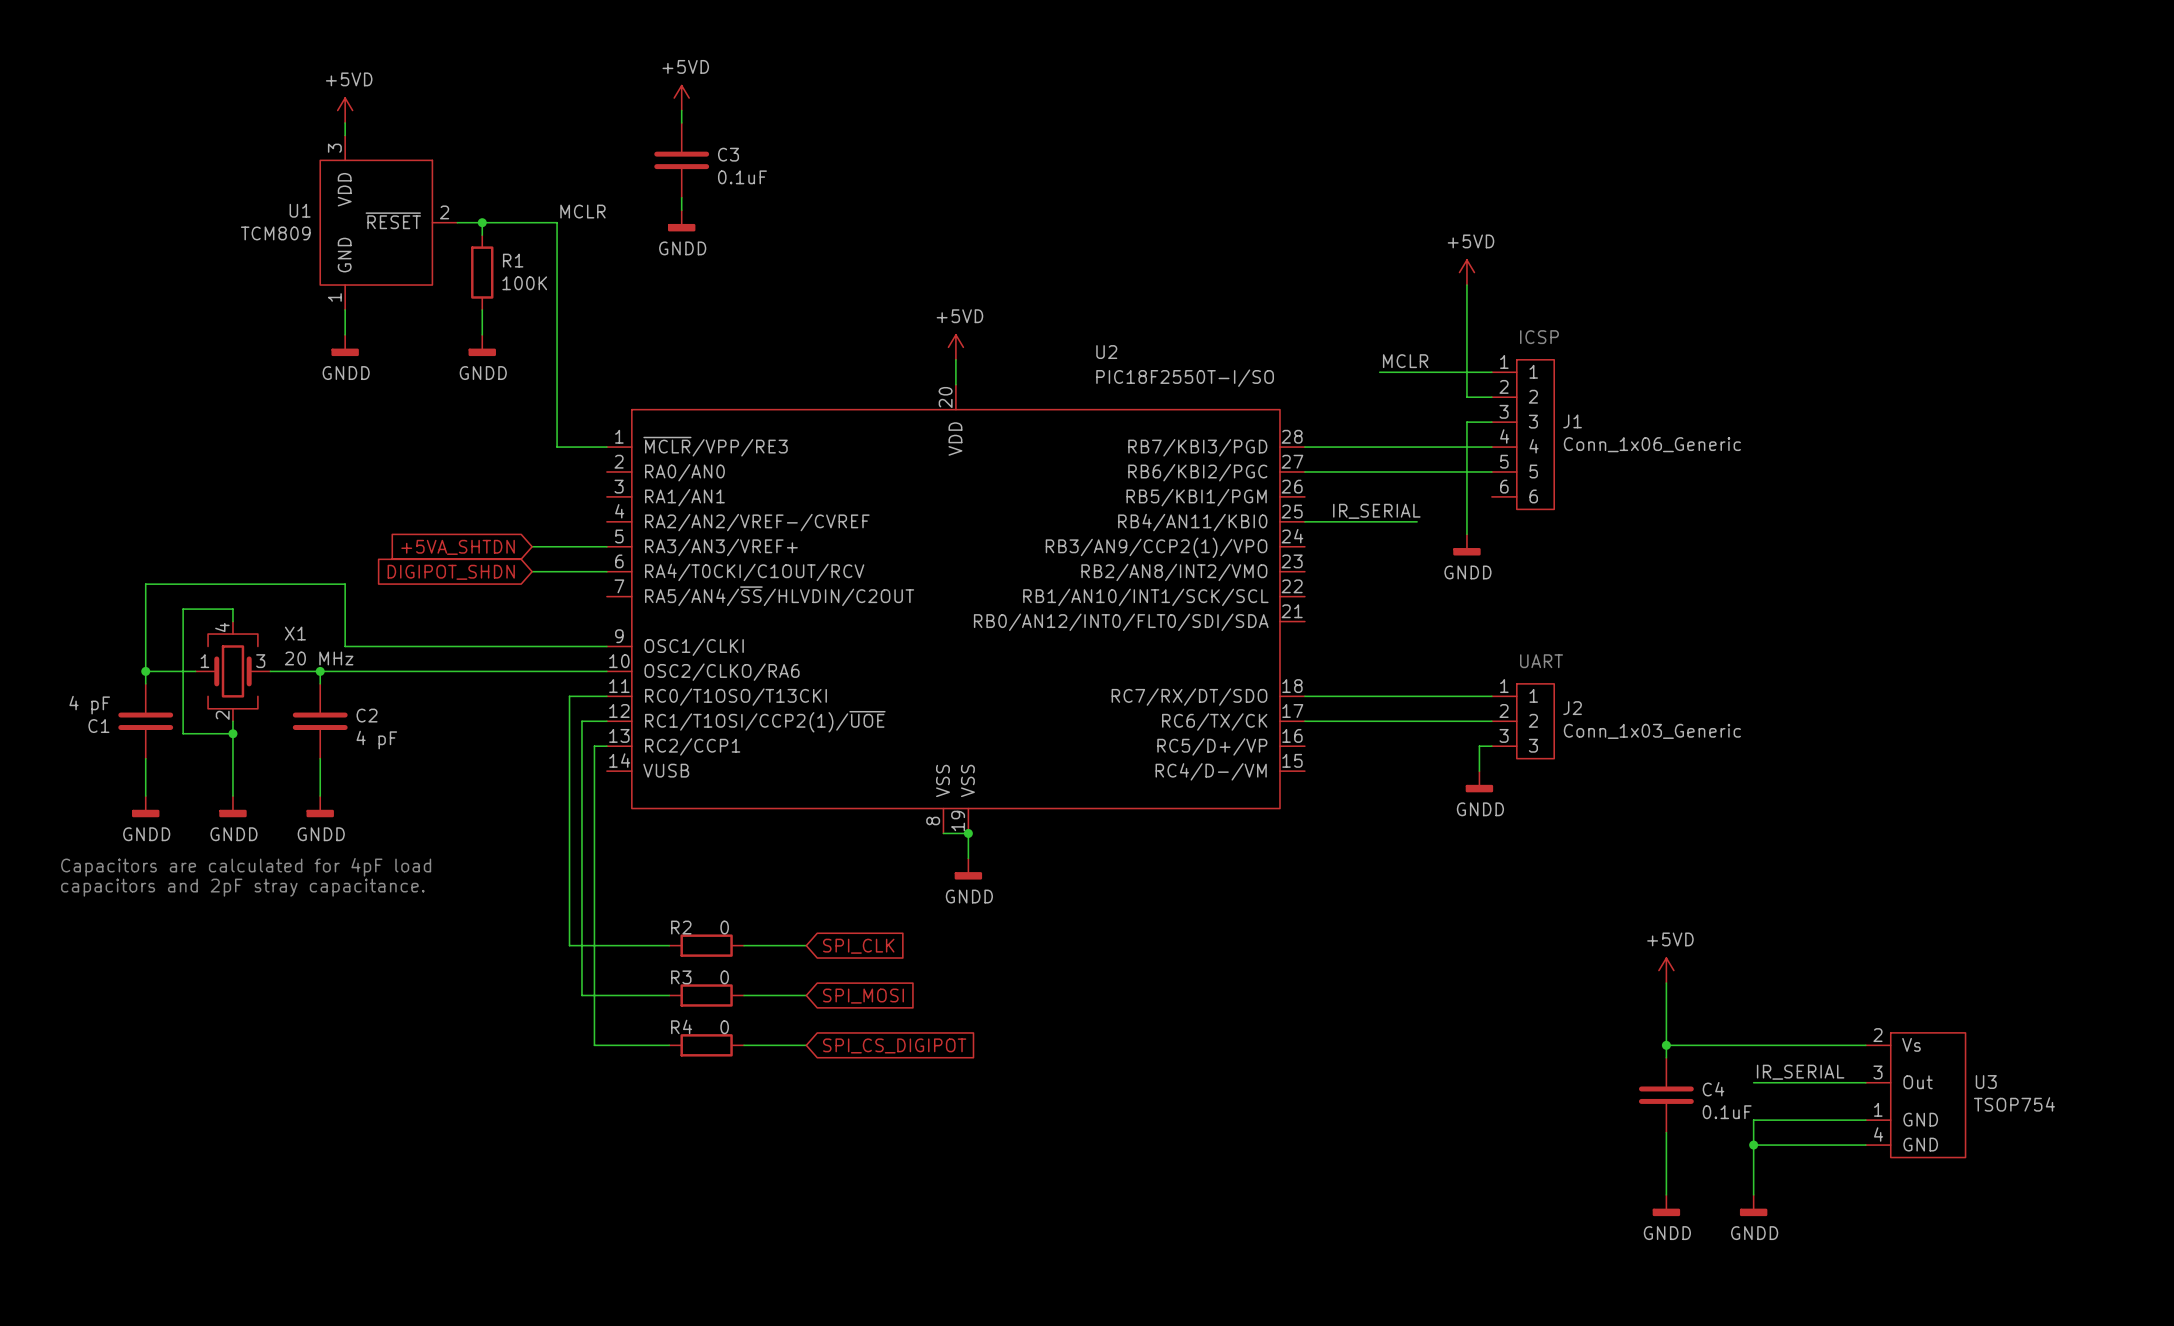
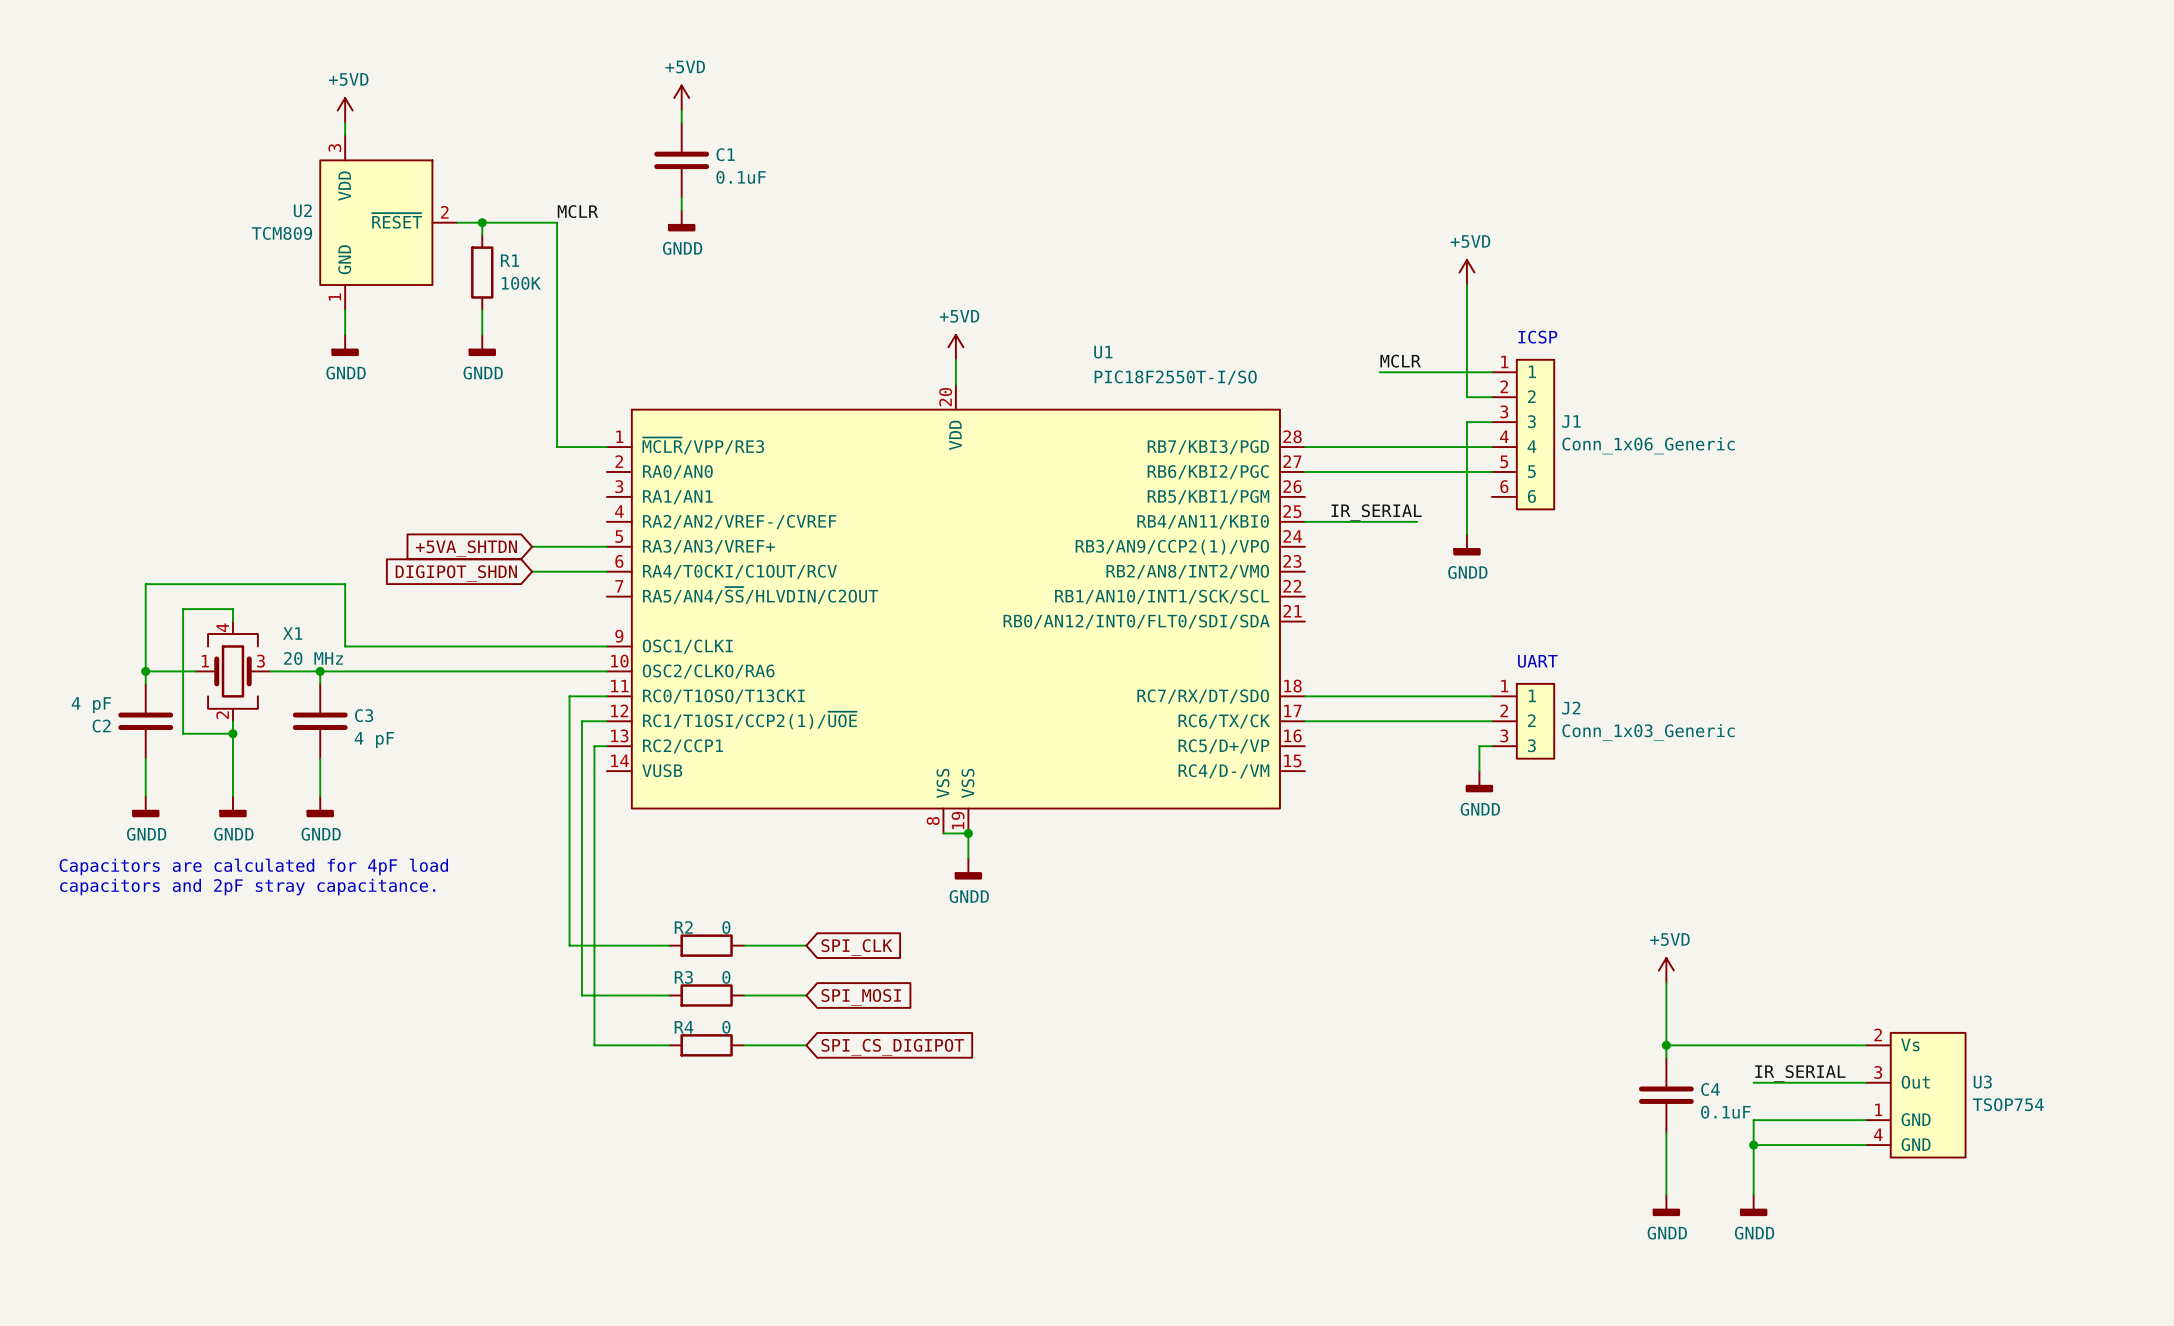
C3 name: C3 (728, 154) -> C1 (725, 154)
U1 name: U1 (300, 210) -> U2 (302, 210)
U2 name: U2 (1106, 352) -> U1 (1103, 352)
C2 name: C2 (367, 715) -> C3 (364, 715)
C1 name: C1 (98, 726) -> C2 (101, 726)

